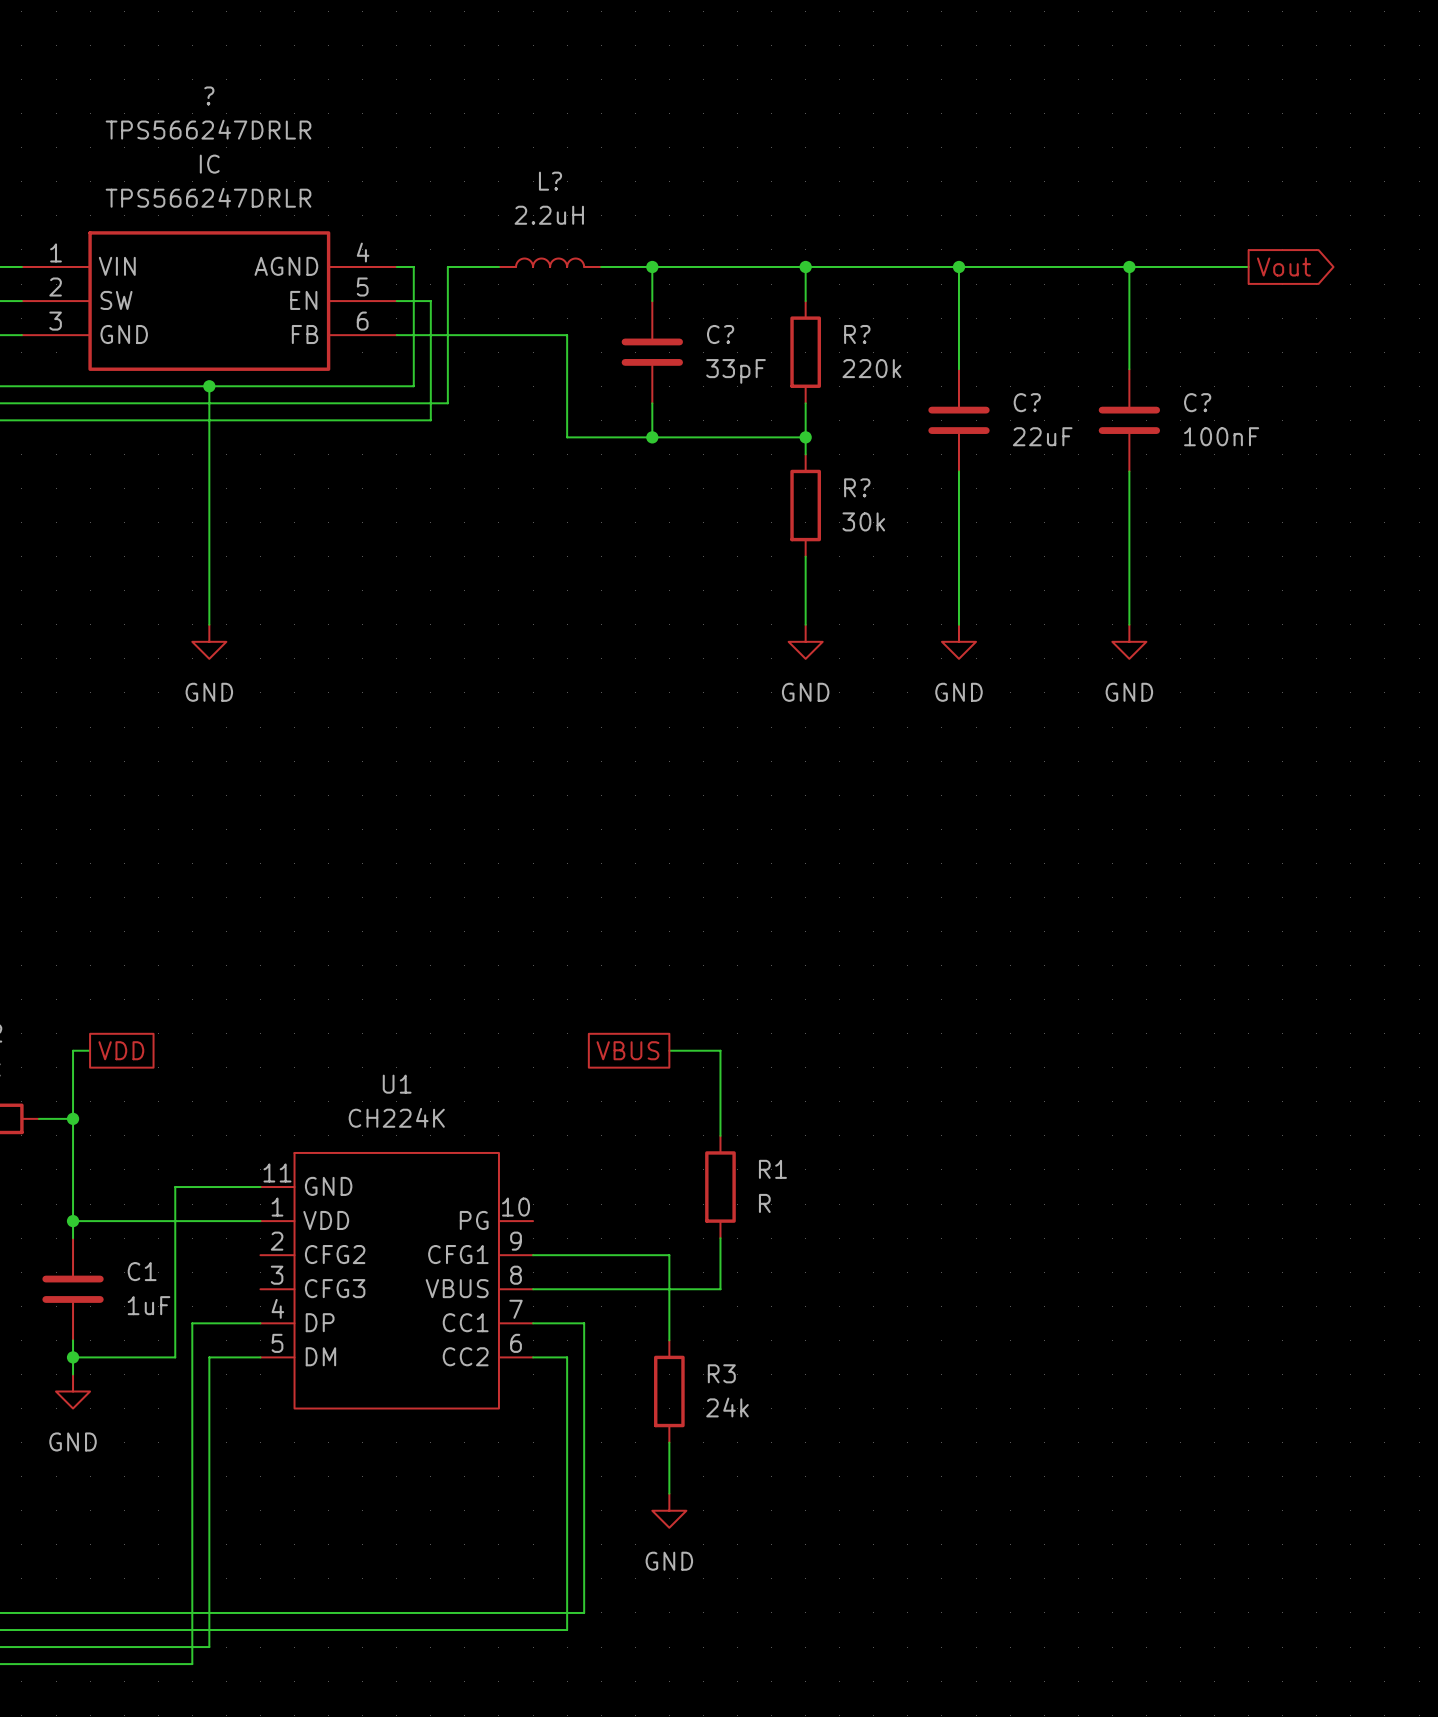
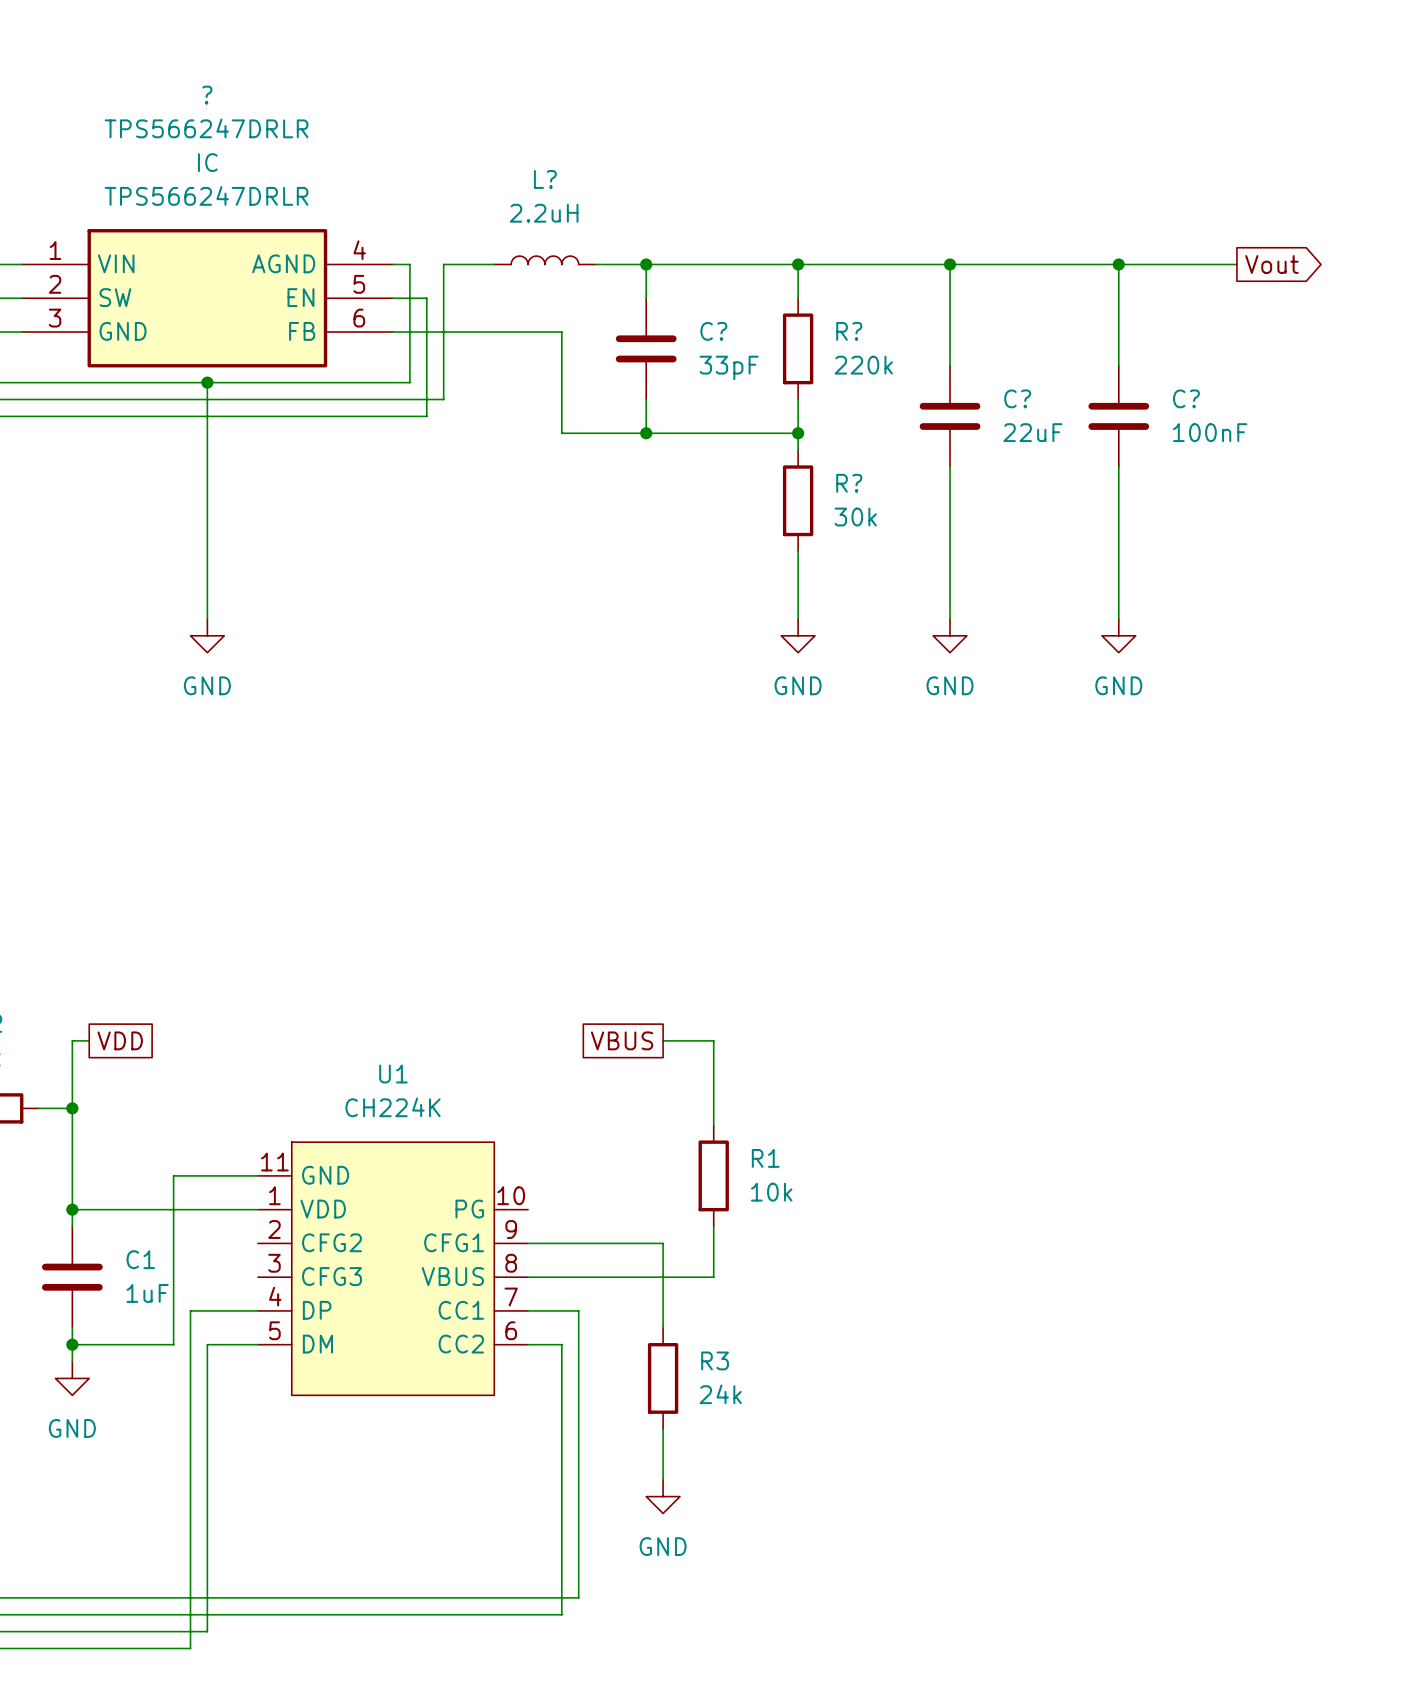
R1 value: R (764, 1203) -> 10k (771, 1192)

